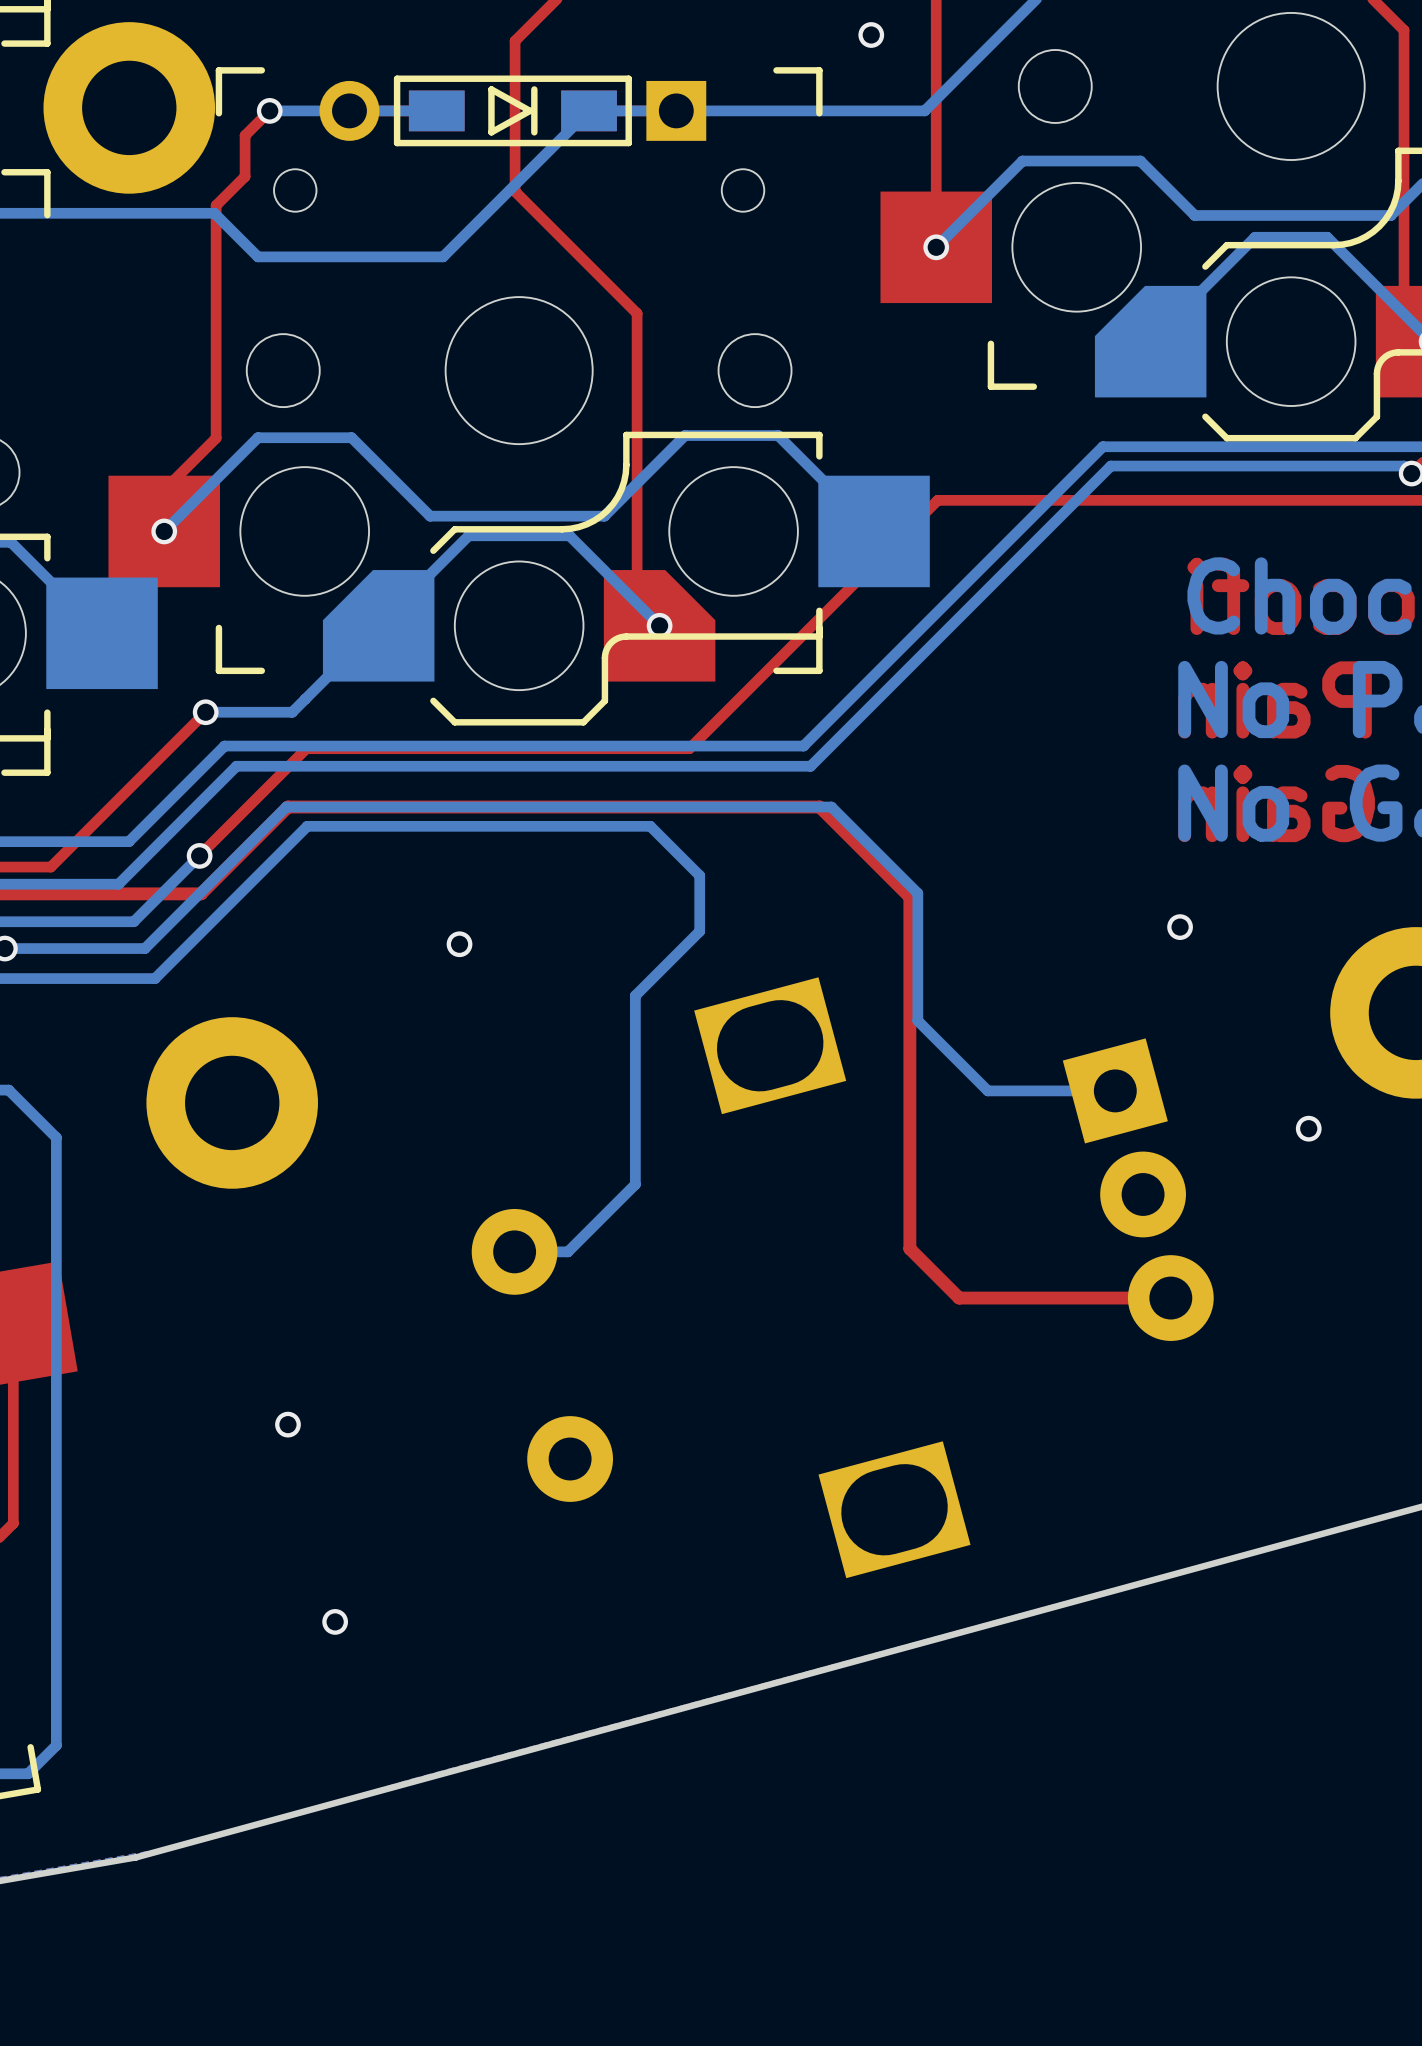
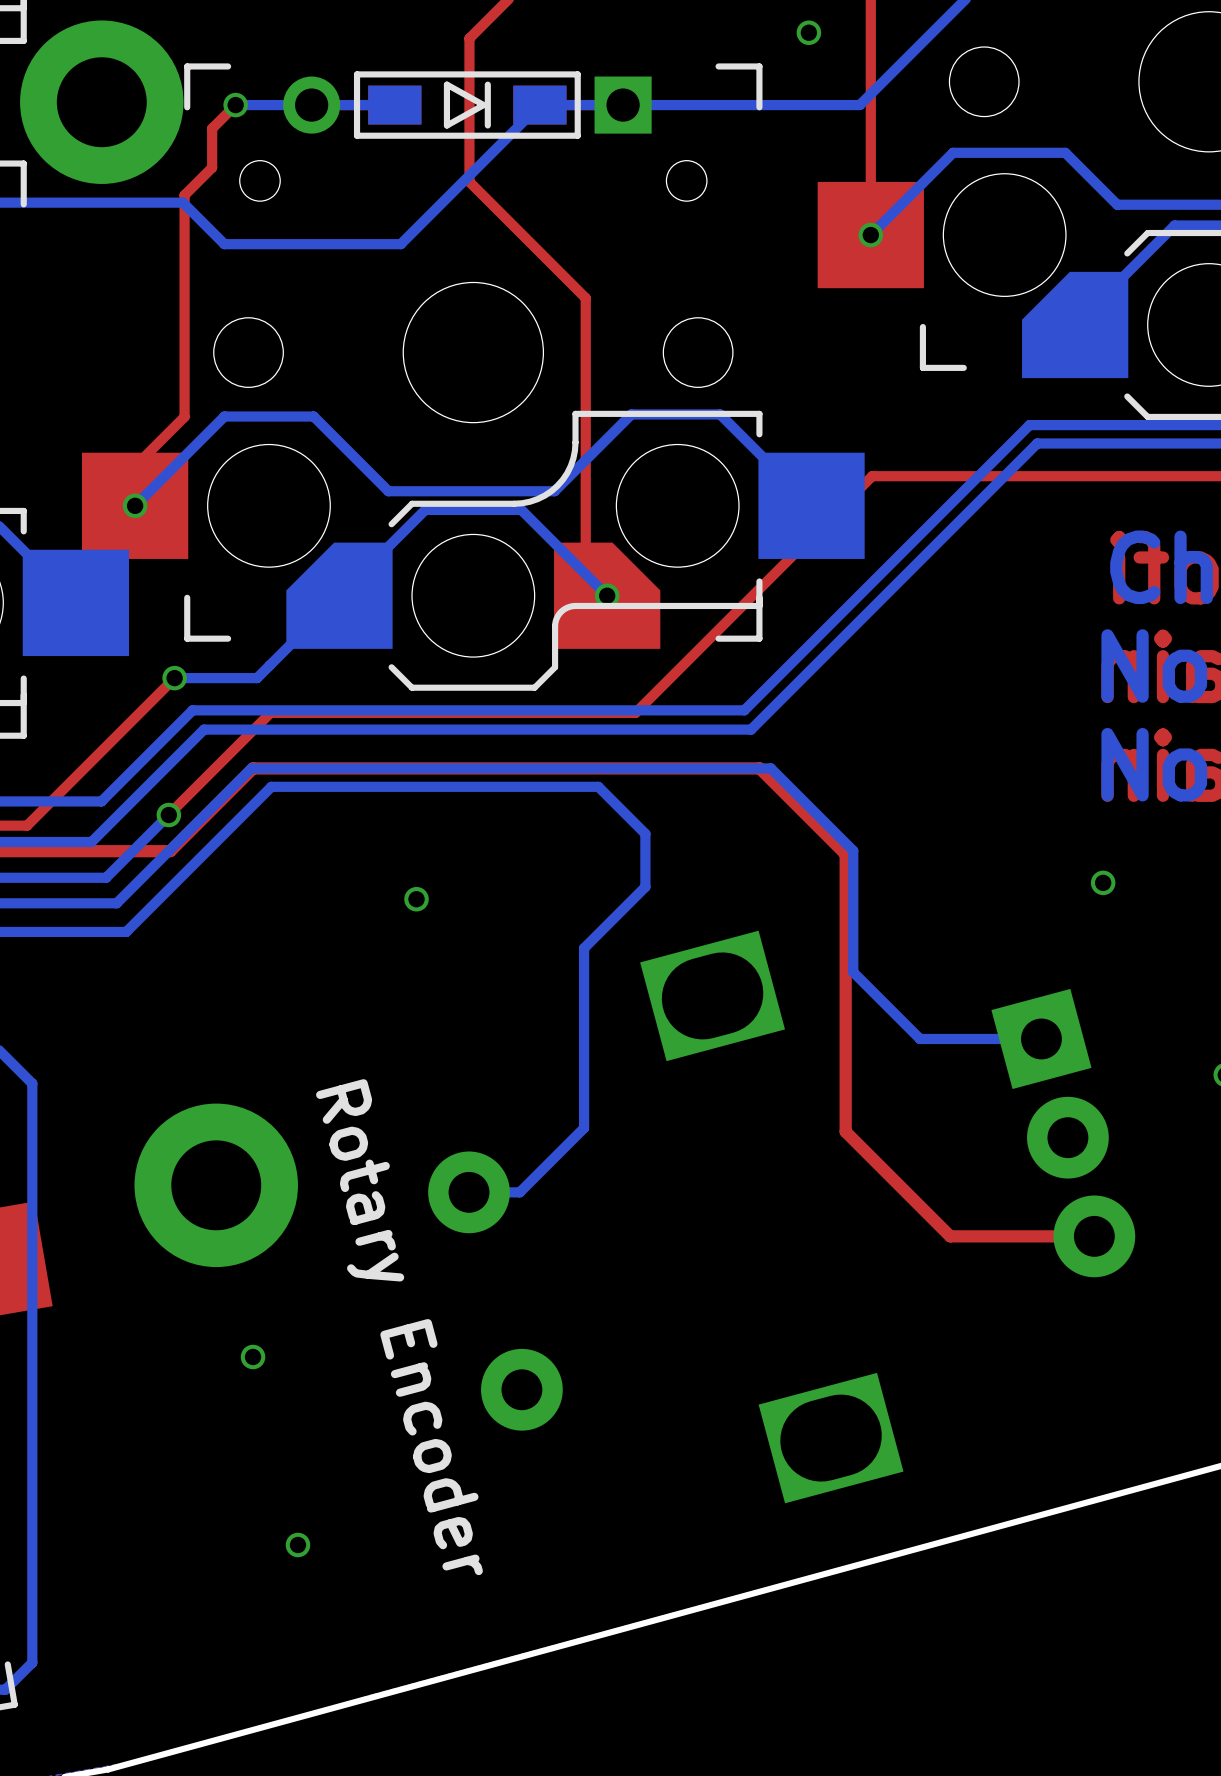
part position: (232, 1102) -> (216, 1185)
top track: (909, 1188) (909, 1248) (959, 1298) (1019, 1298) -> (845, 1131) (950, 1236)
text: none -> Rotary Encoder (399, 1327)

